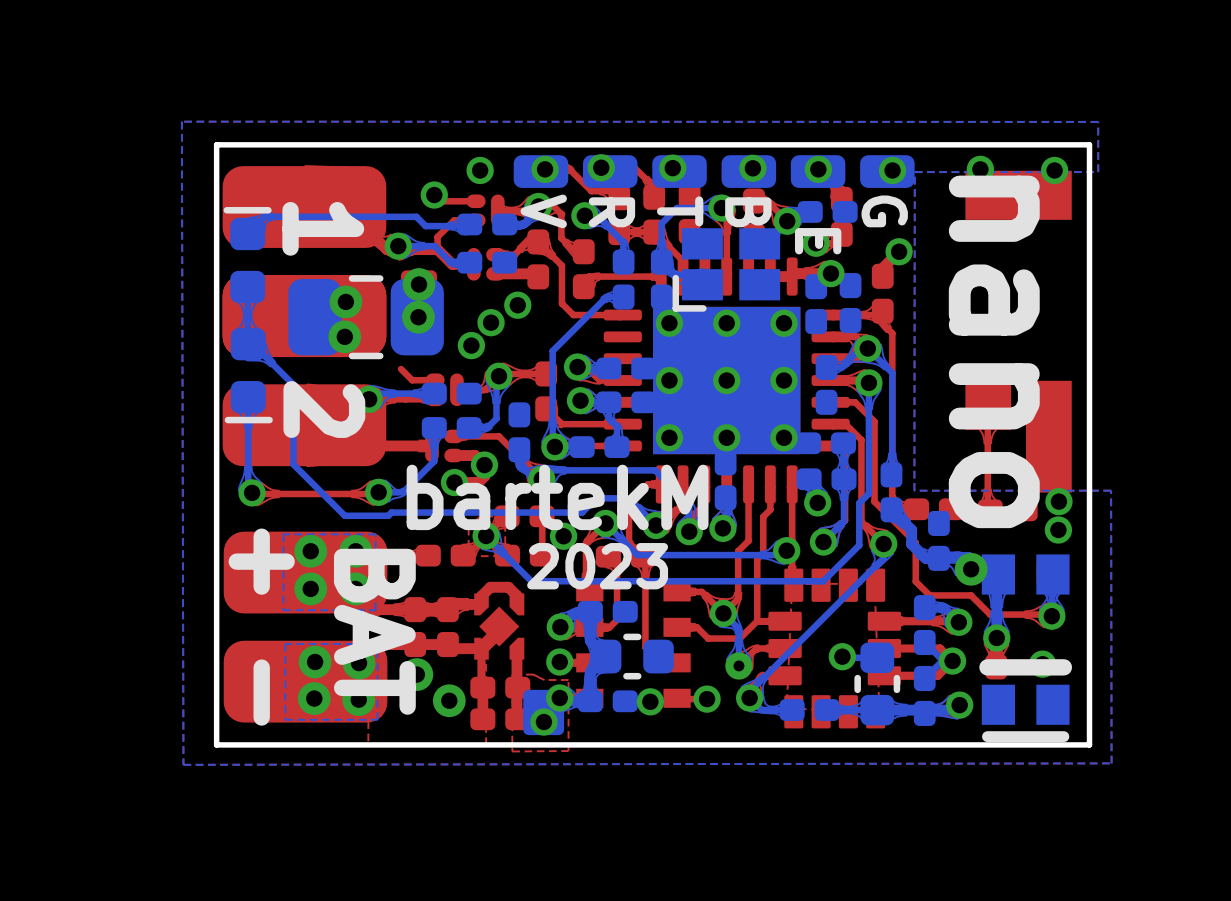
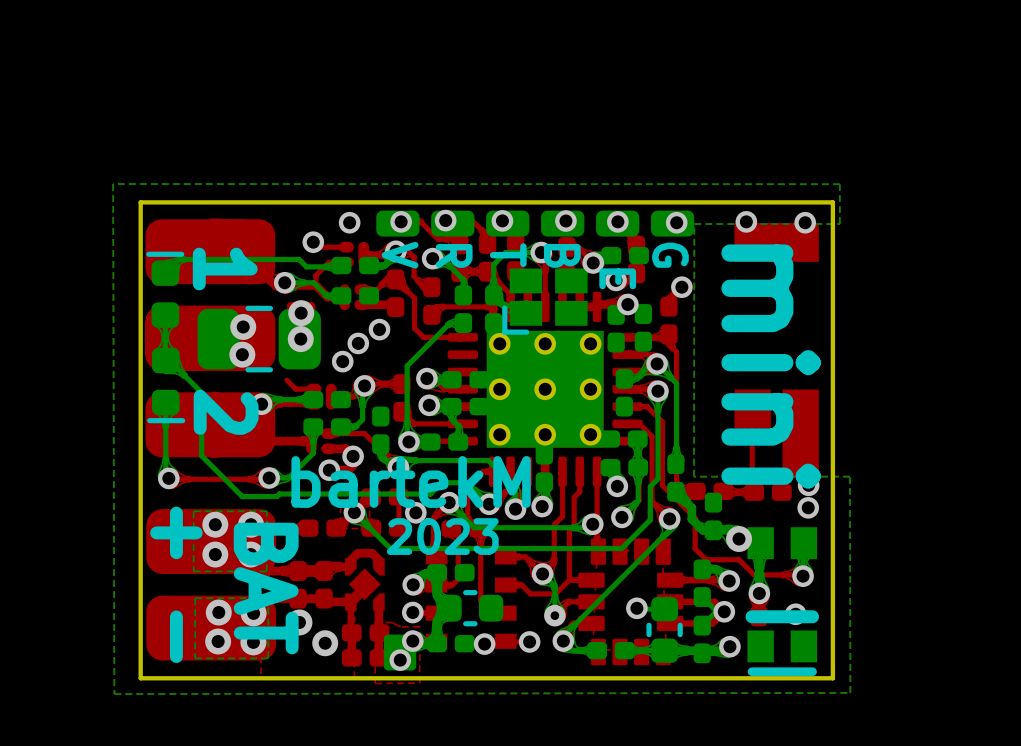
text: nano (994, 351) -> mini (771, 366)

